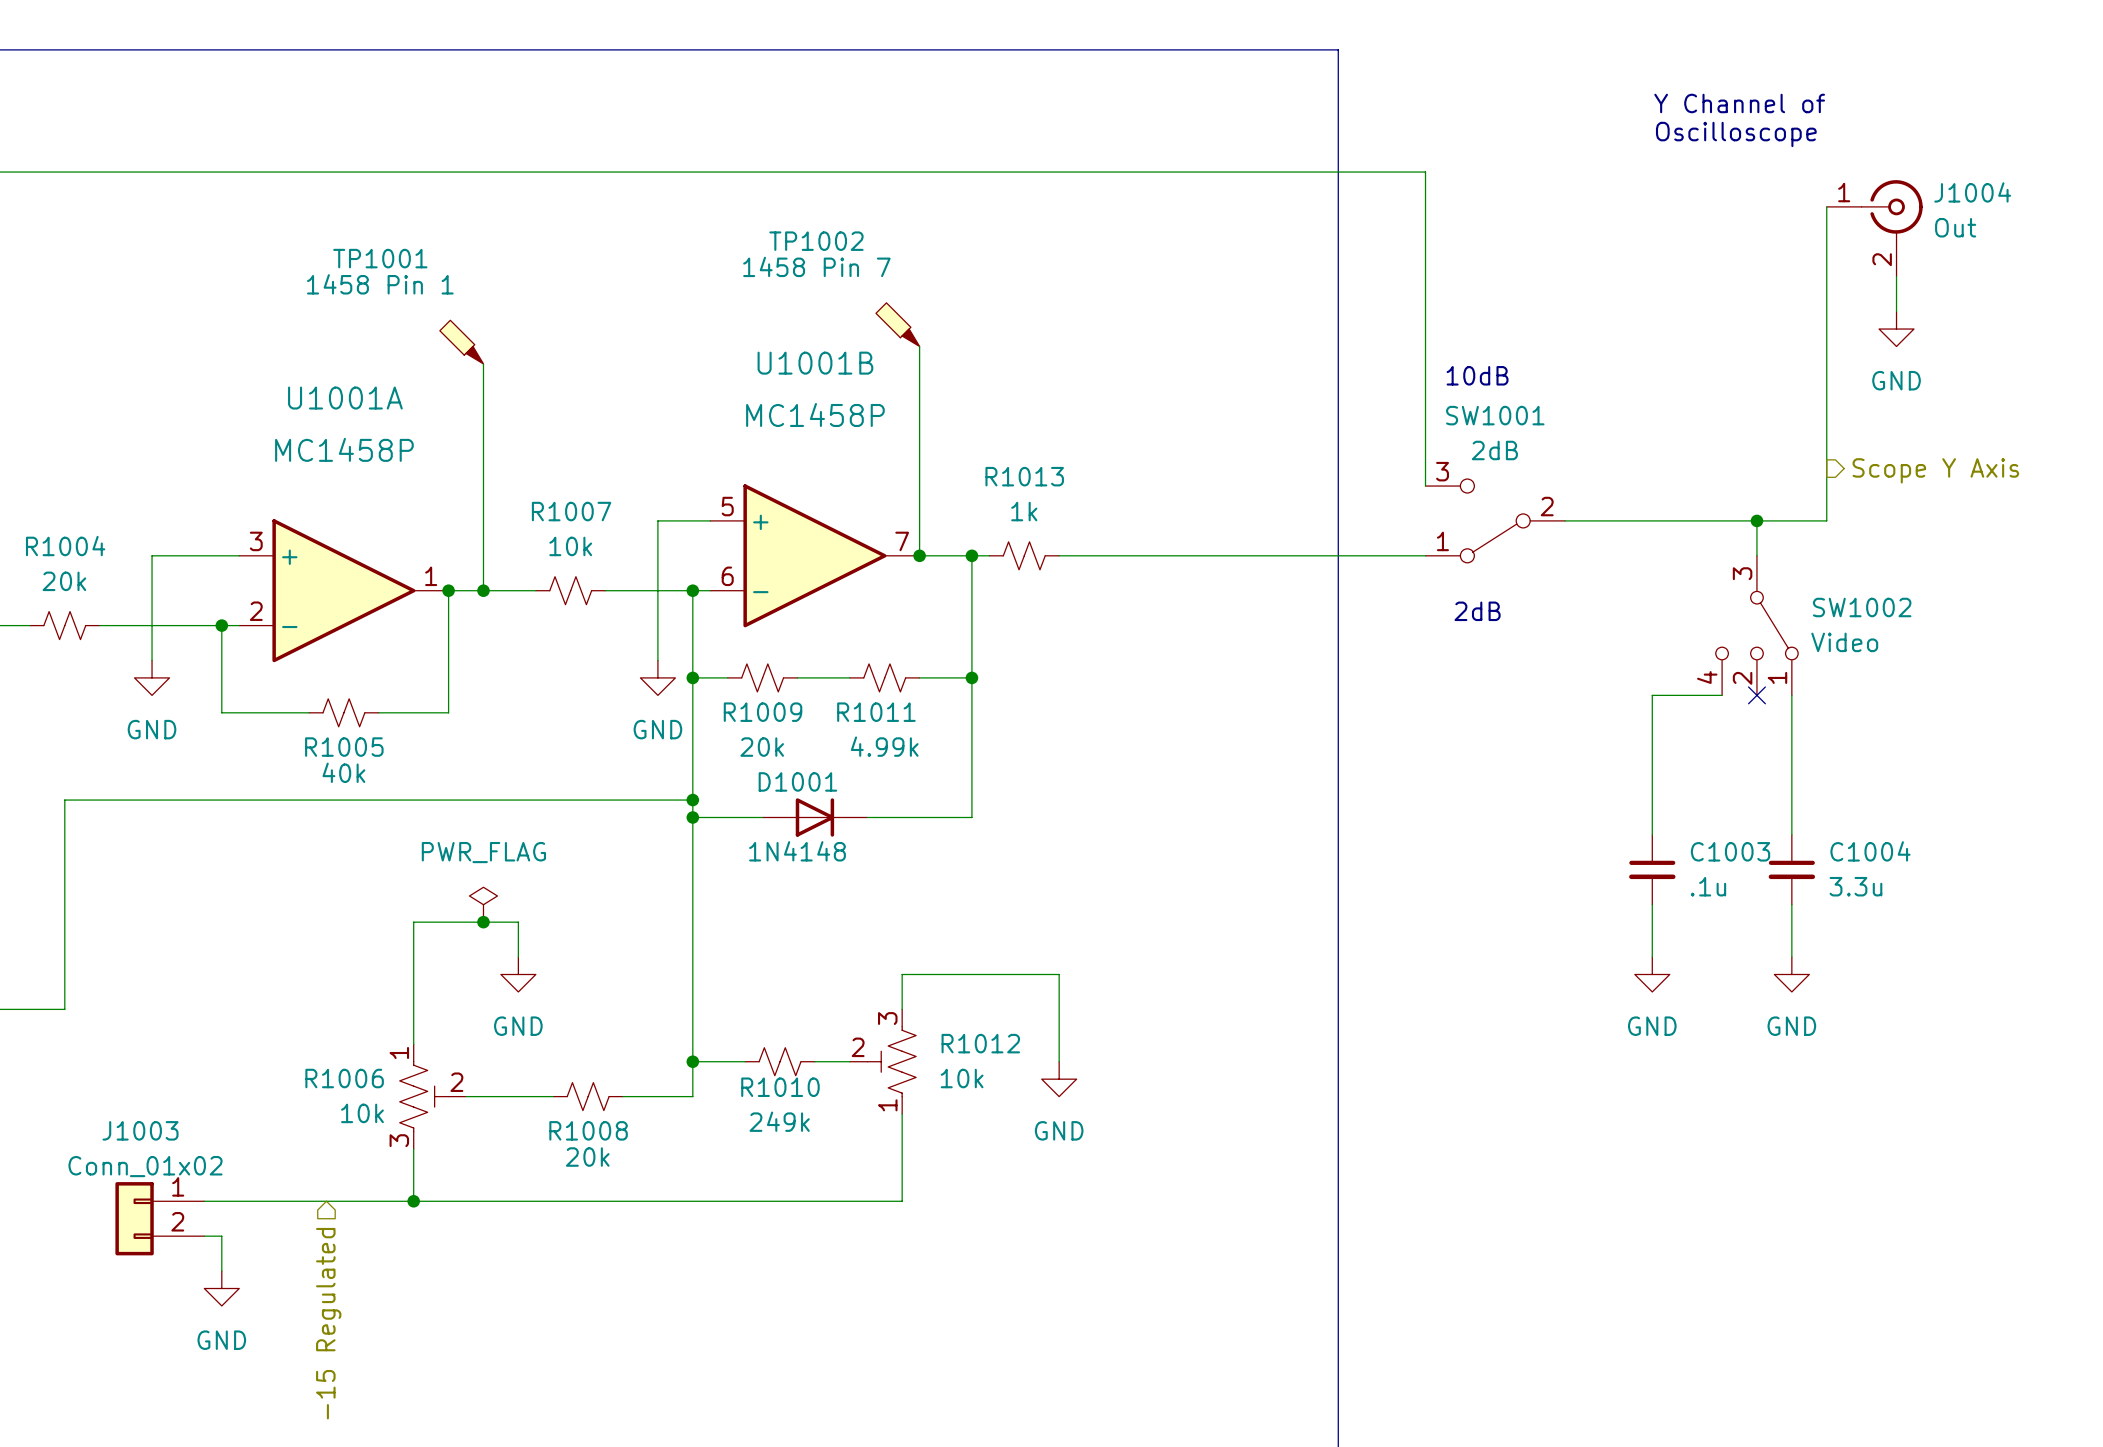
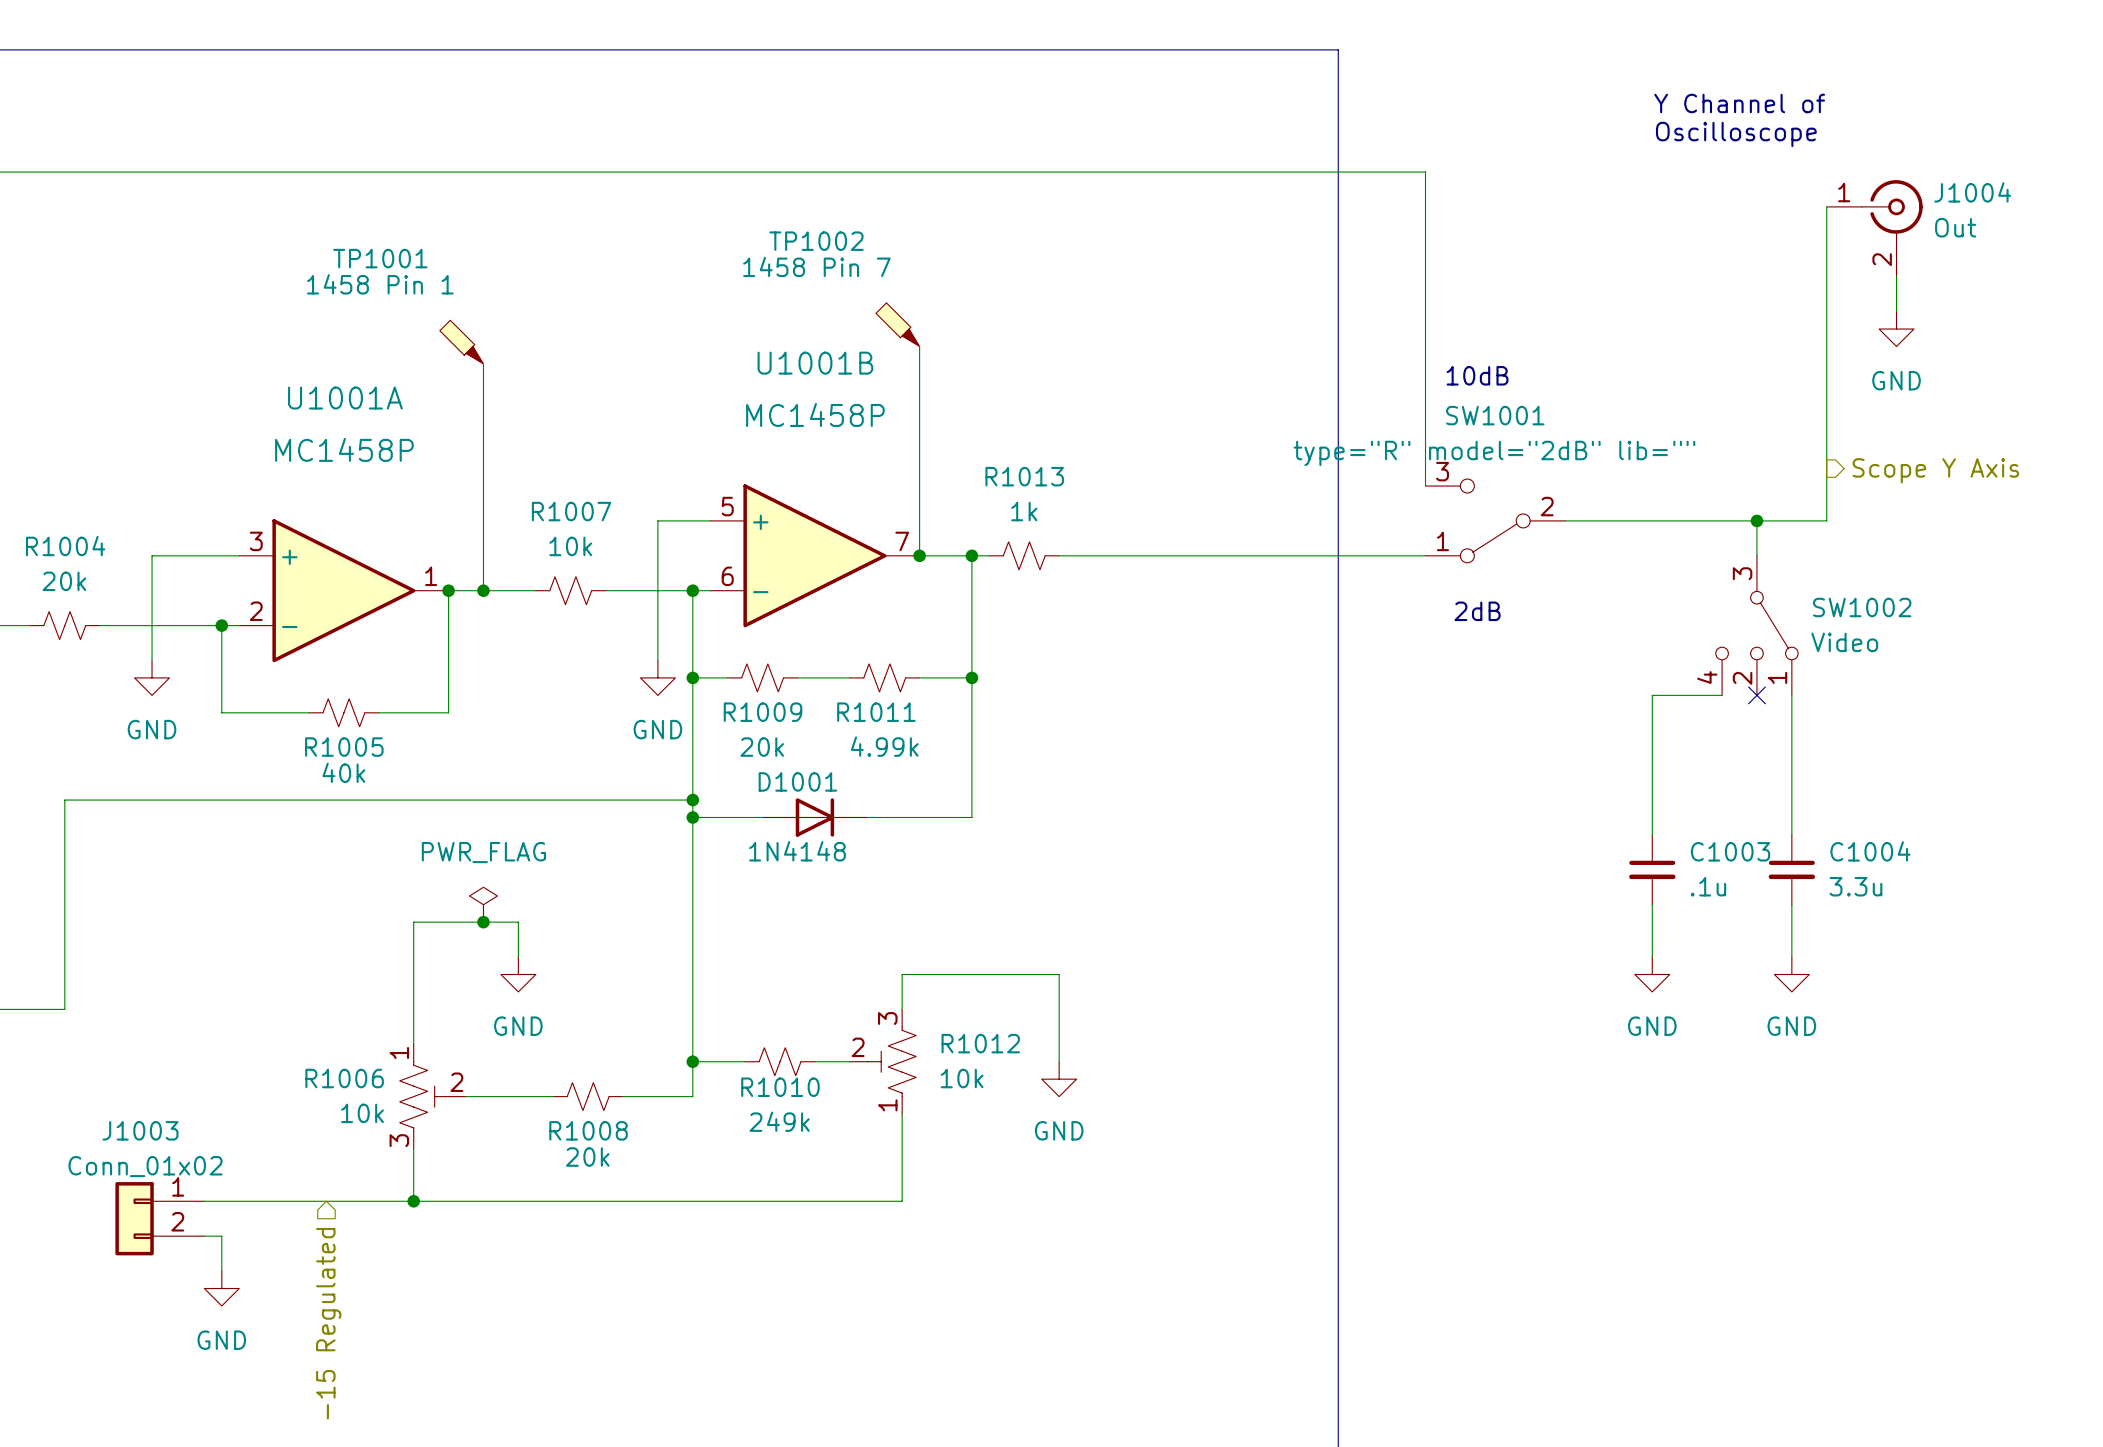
SW1001 value: 2dB (1494, 450) -> type="R" model="2dB" lib="" (1494, 453)

